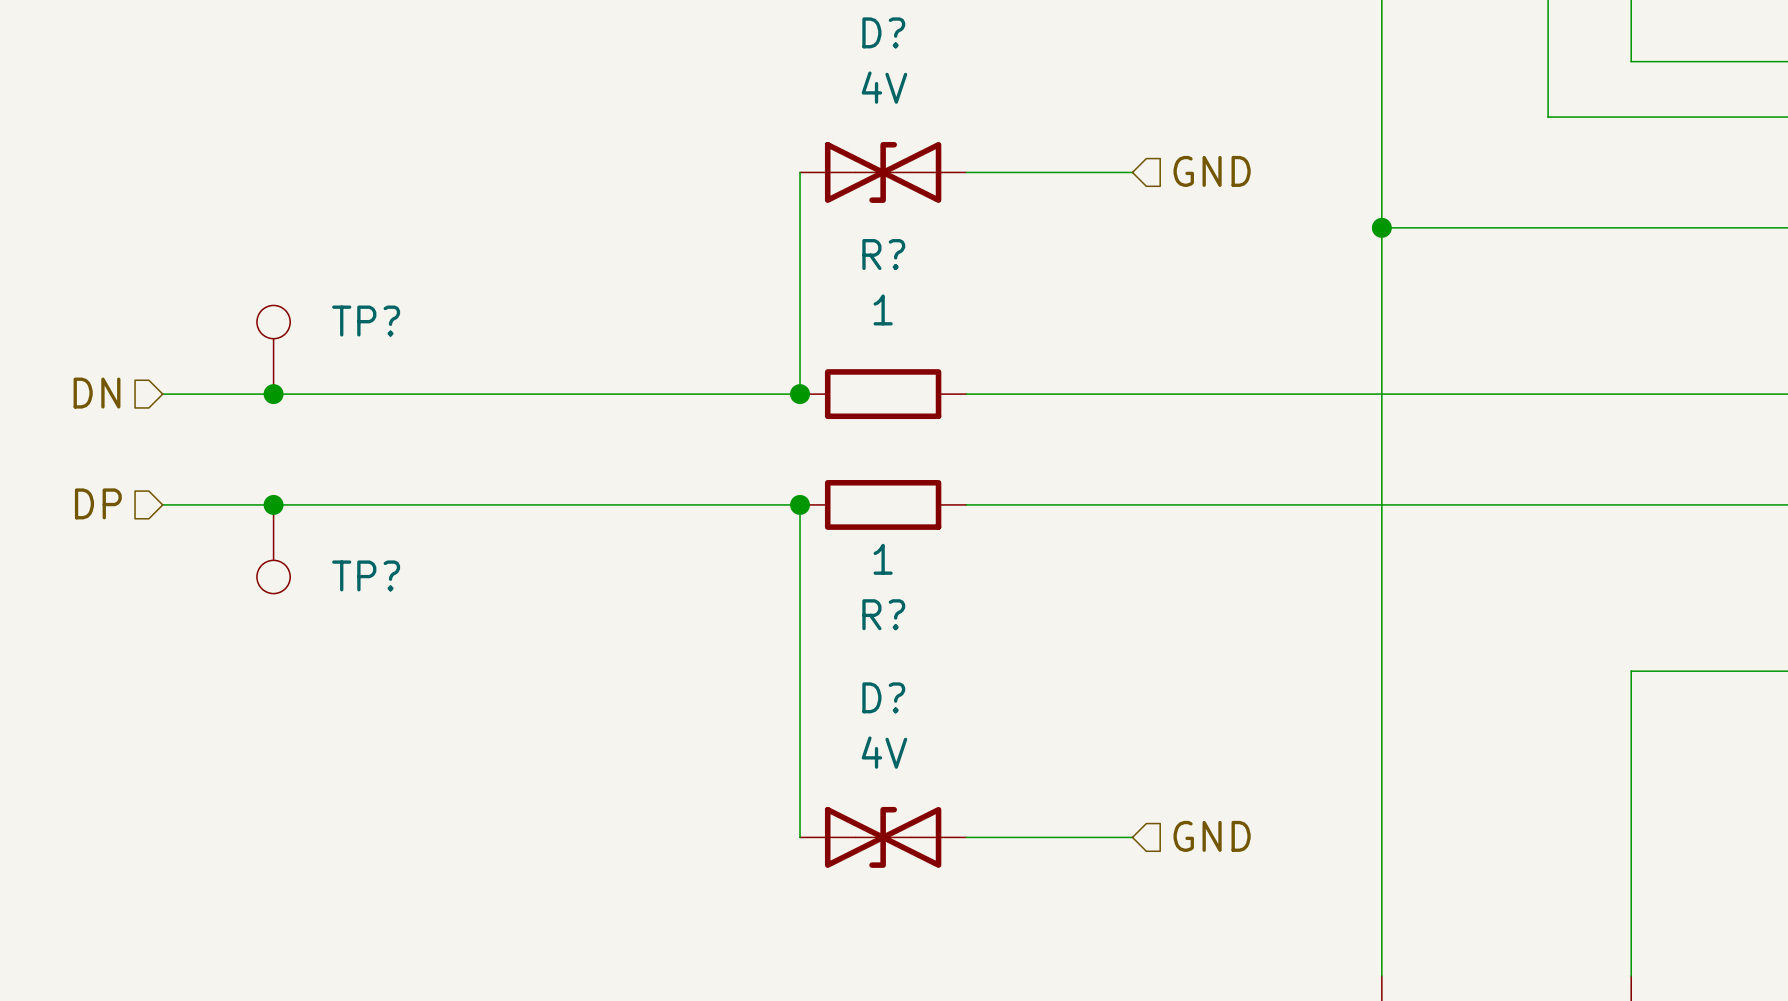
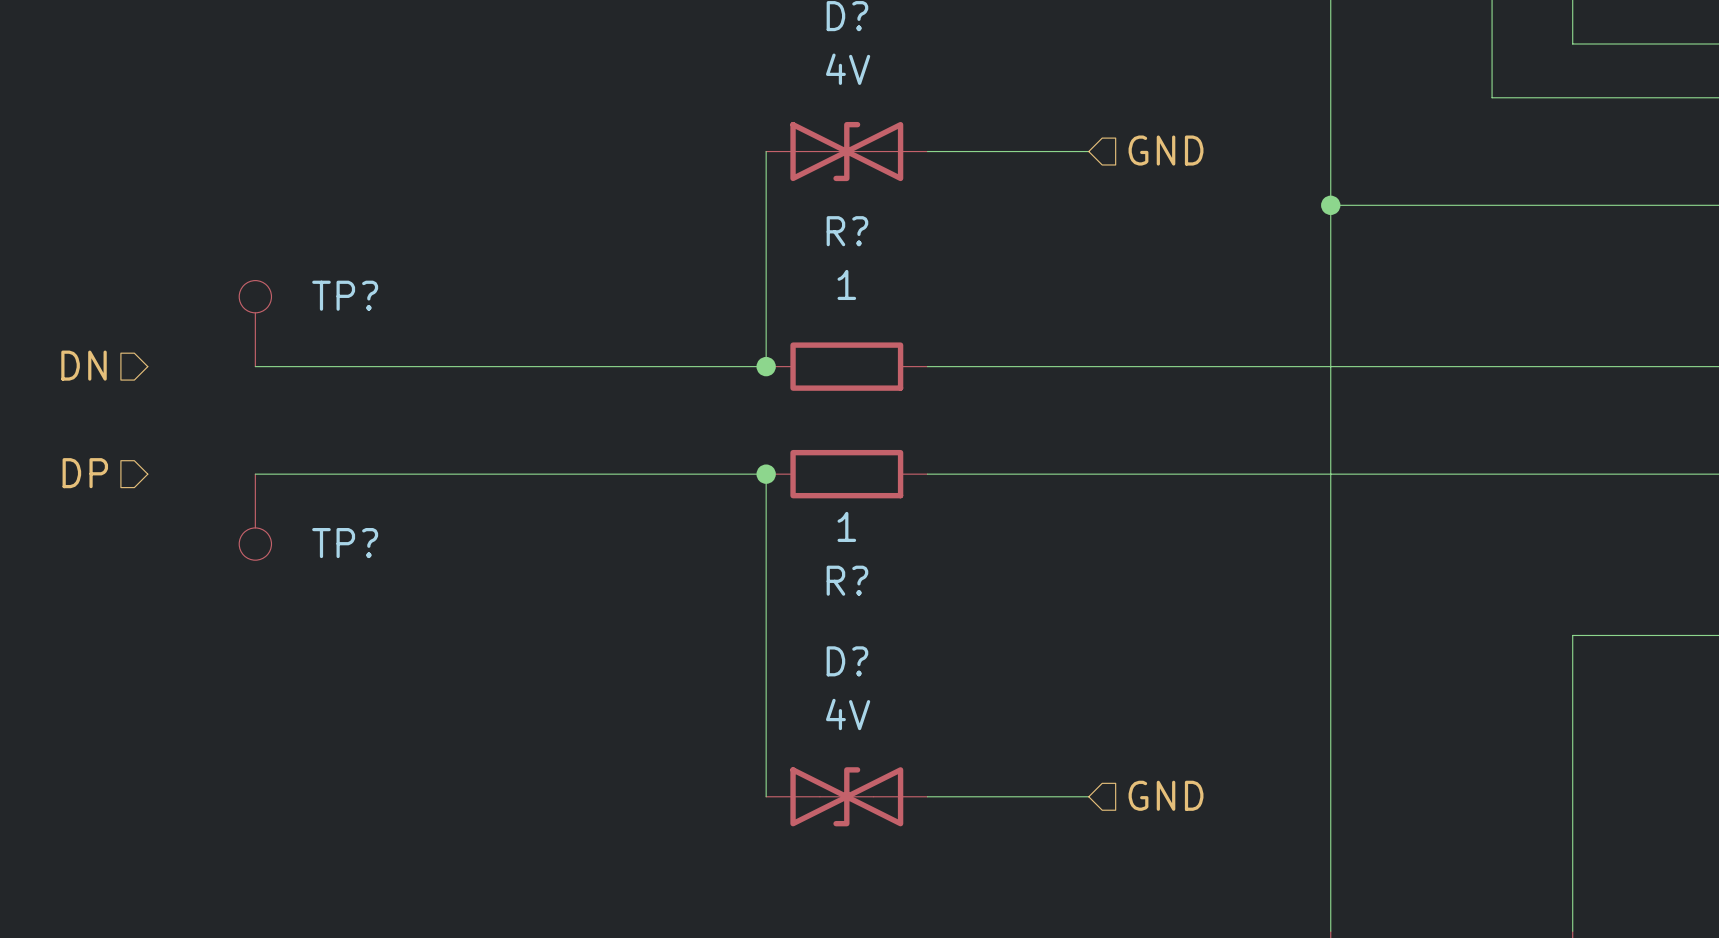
wire: (162, 394) (273, 394) -> none
junction: (273, 394) -> none
wire: (162, 504) (273, 504) -> none
junction: (273, 504) -> none

